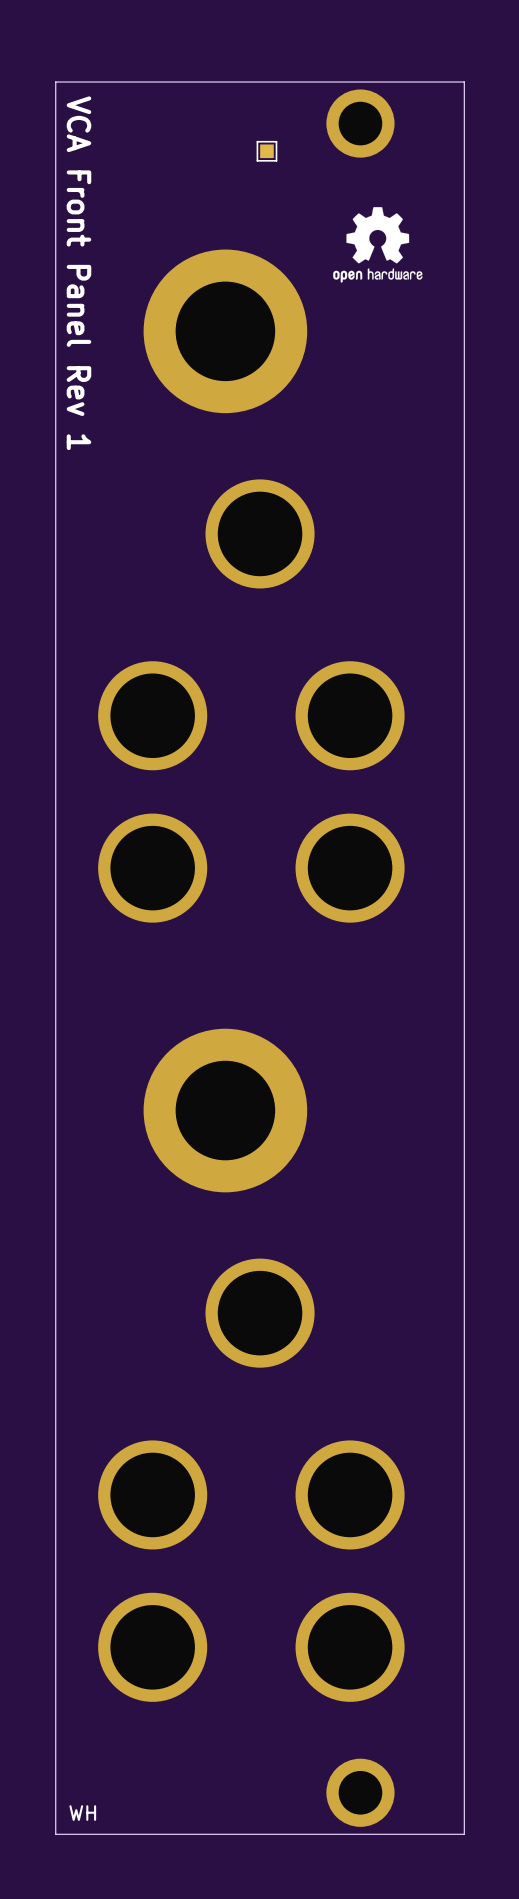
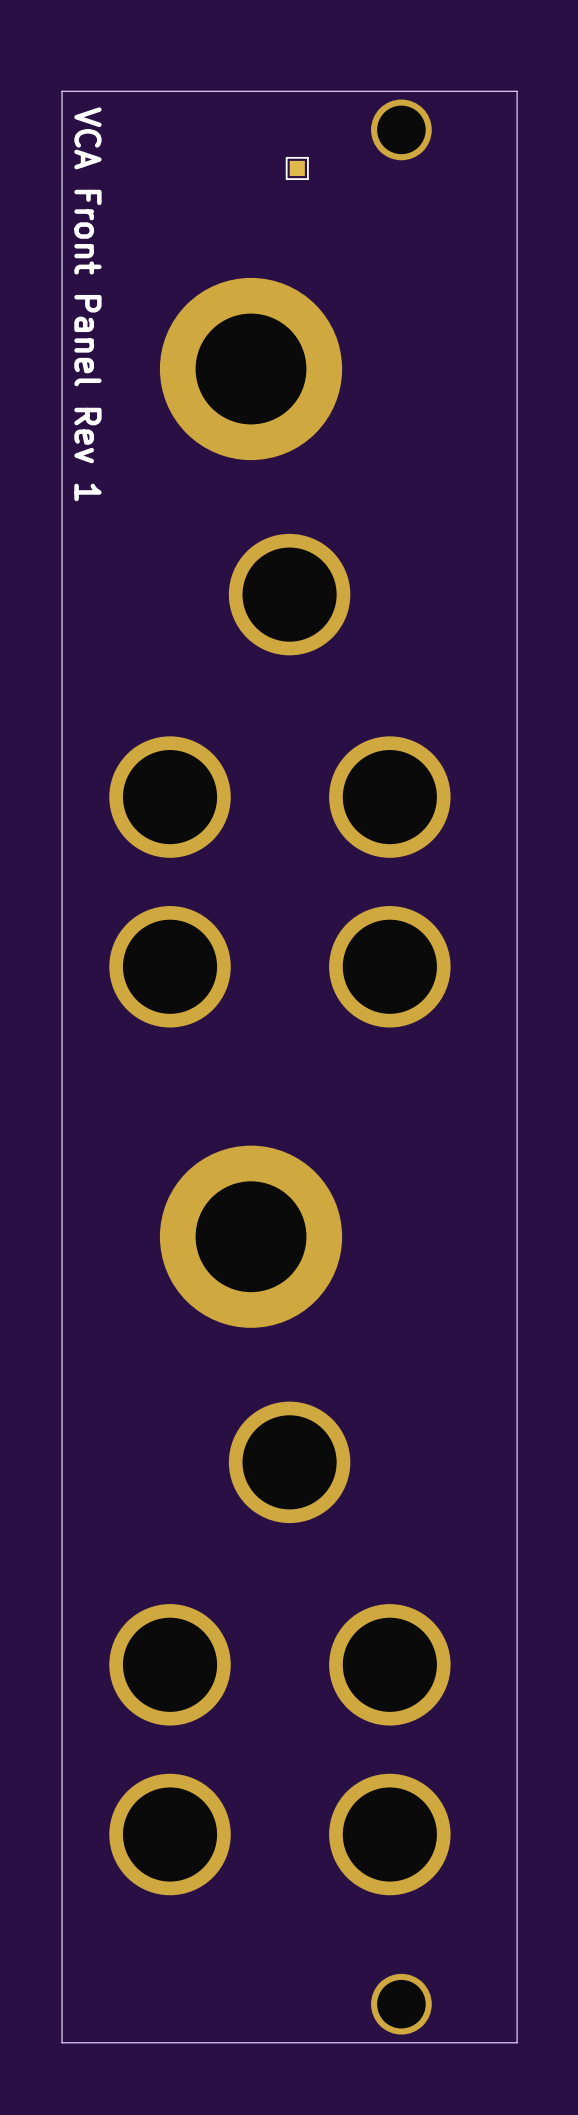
via size: [326, 89, 395, 158] -> [371, 99, 432, 161]
drawing: [333, 207, 423, 283] -> none
via size: [326, 1758, 395, 1827] -> [371, 1973, 432, 2035]
text: WH (82, 1813) -> none

